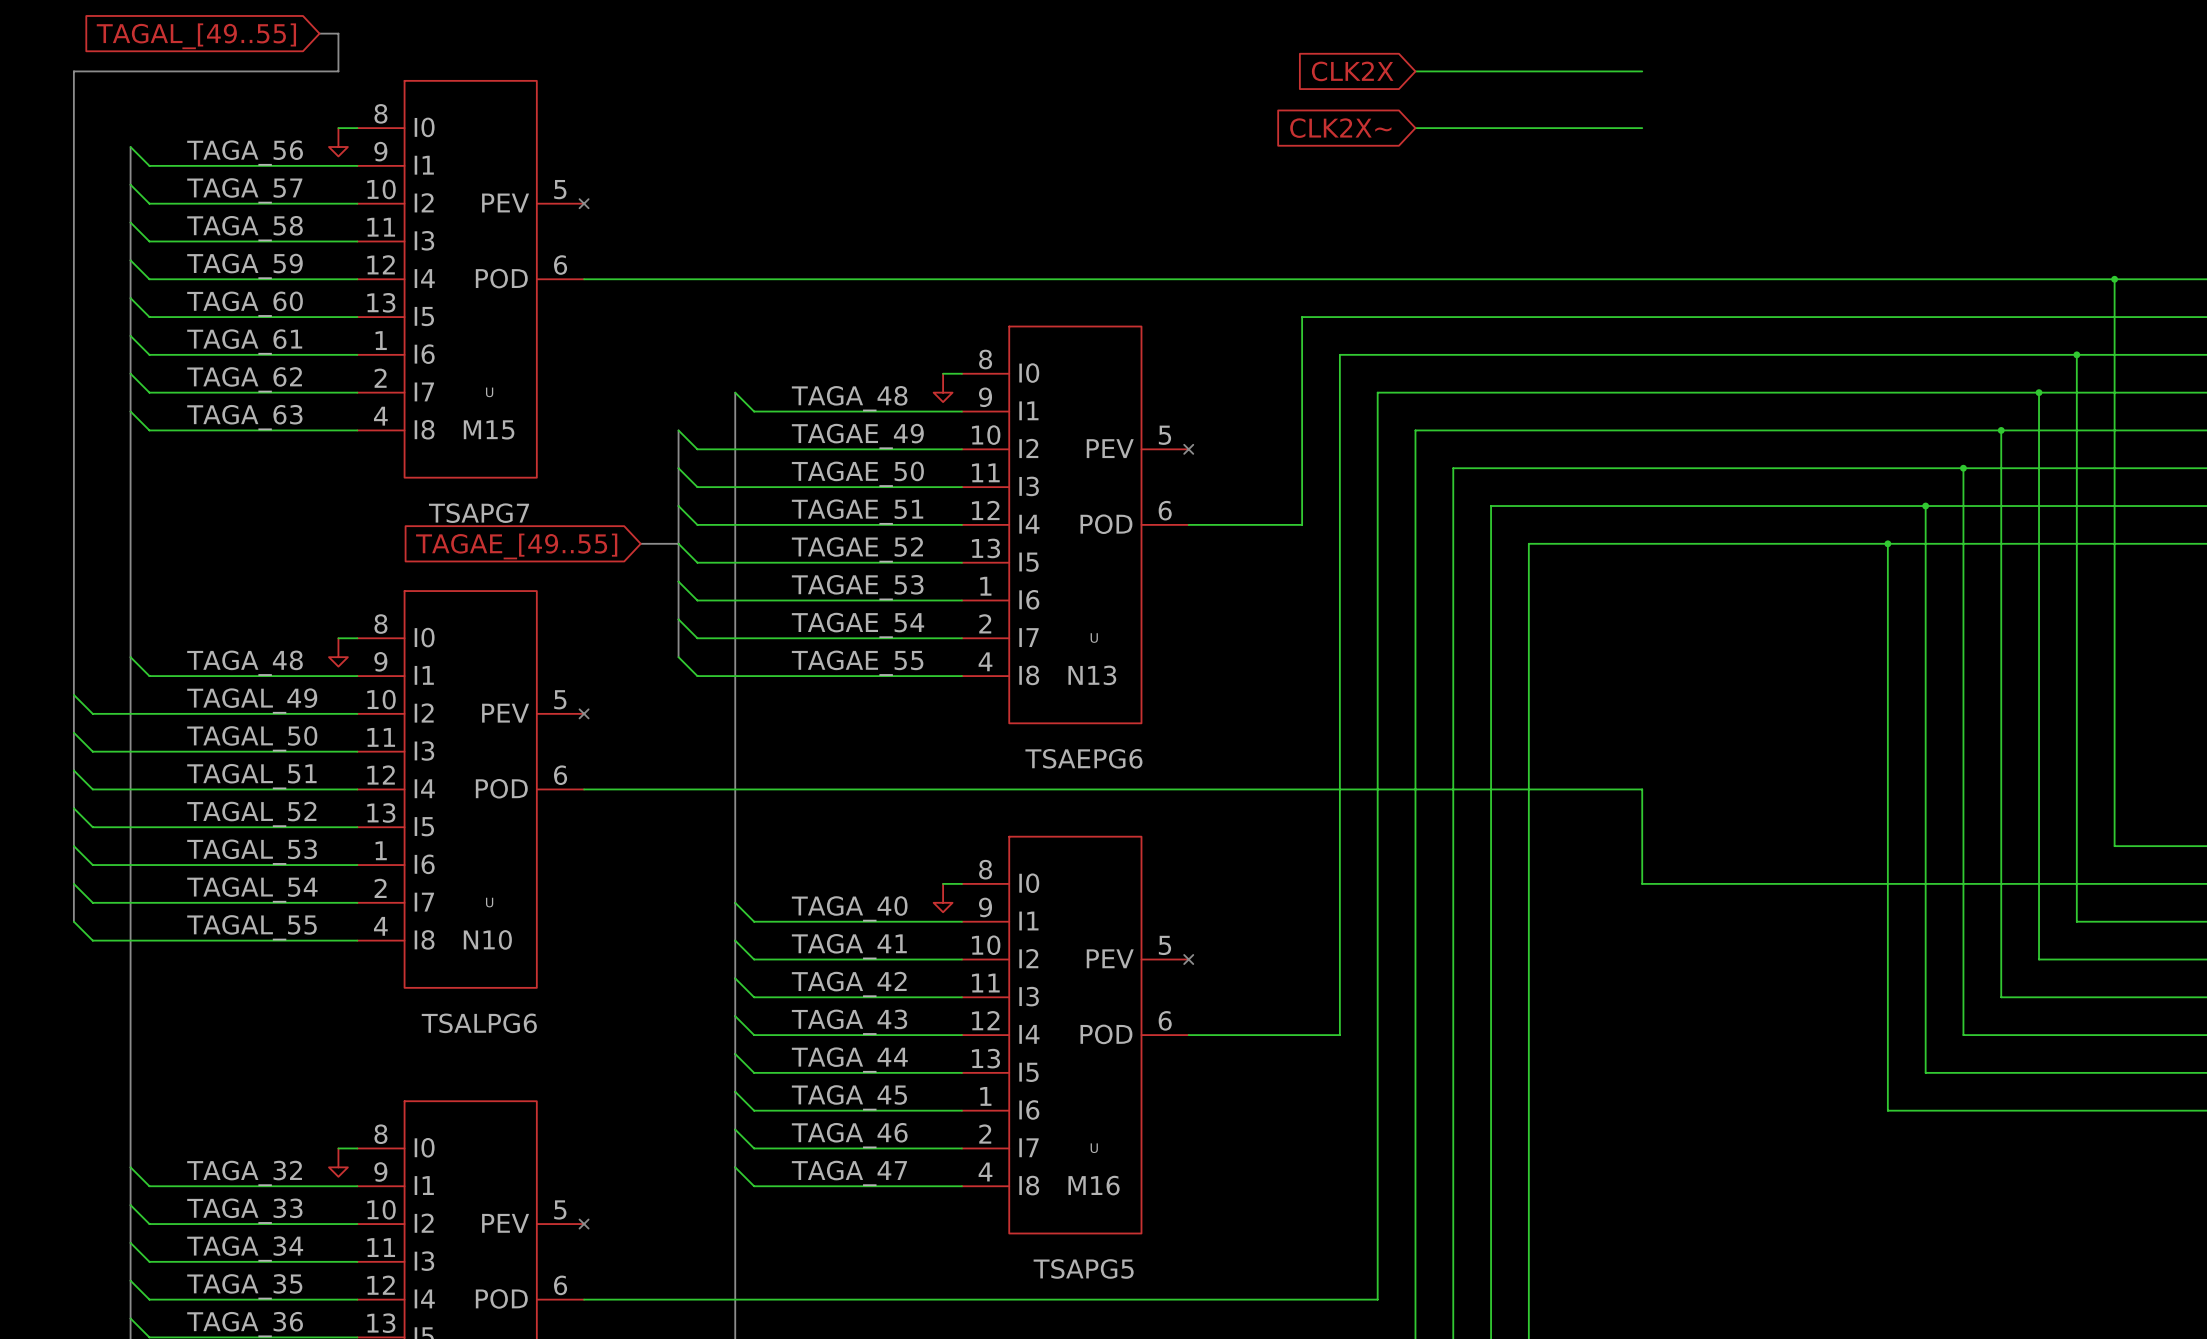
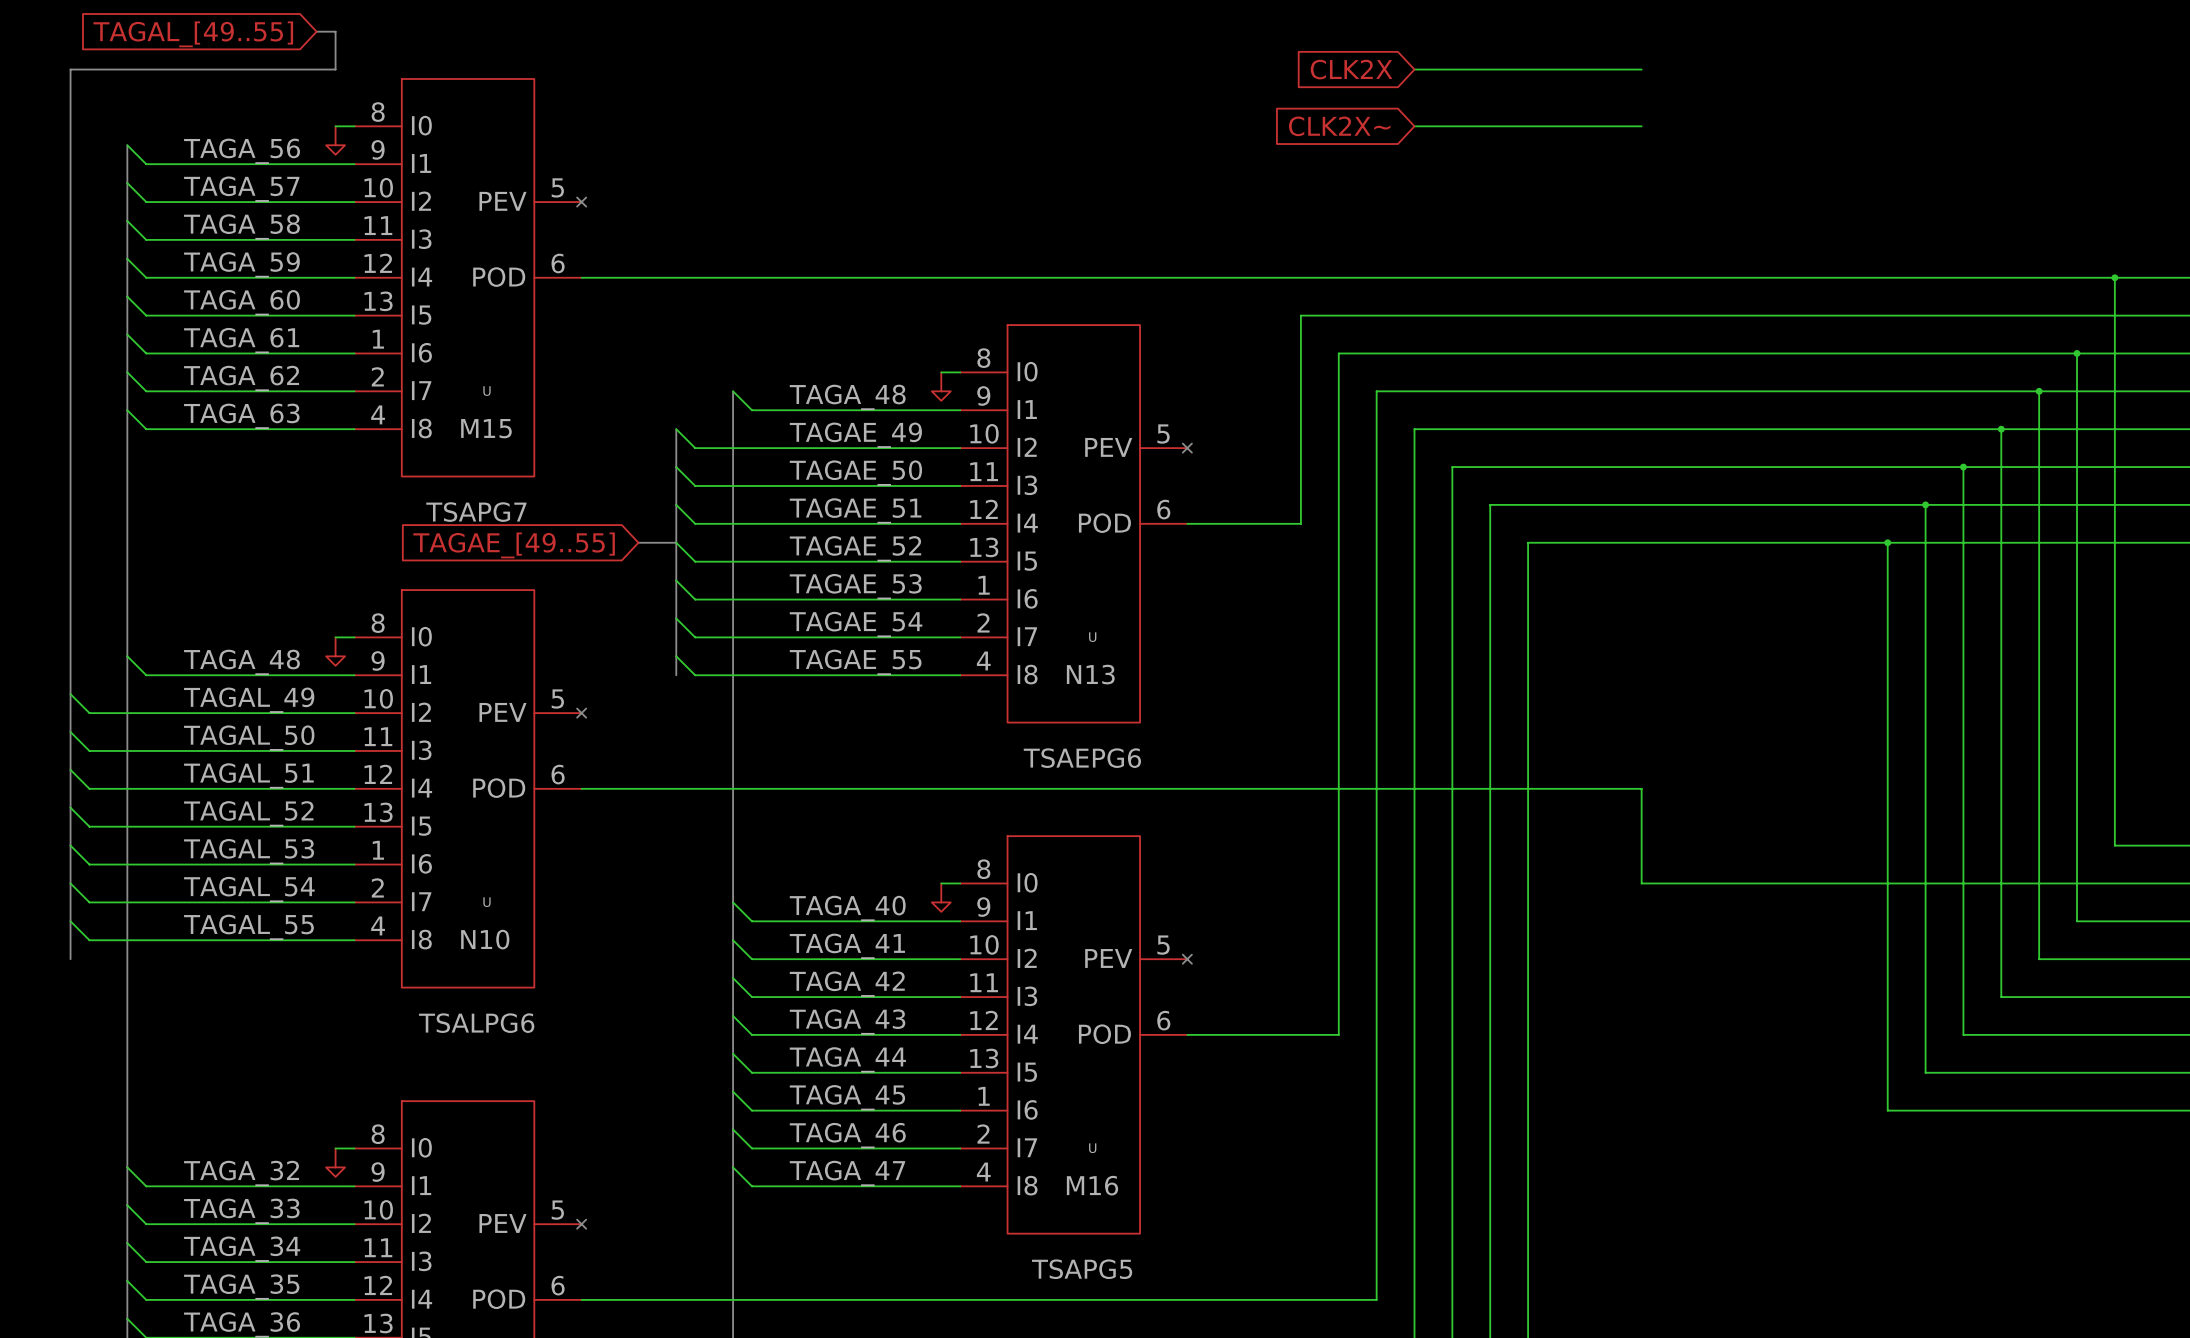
bus: none -> (676, 656) (676, 675)
bus: none -> (70, 921) (70, 959)

